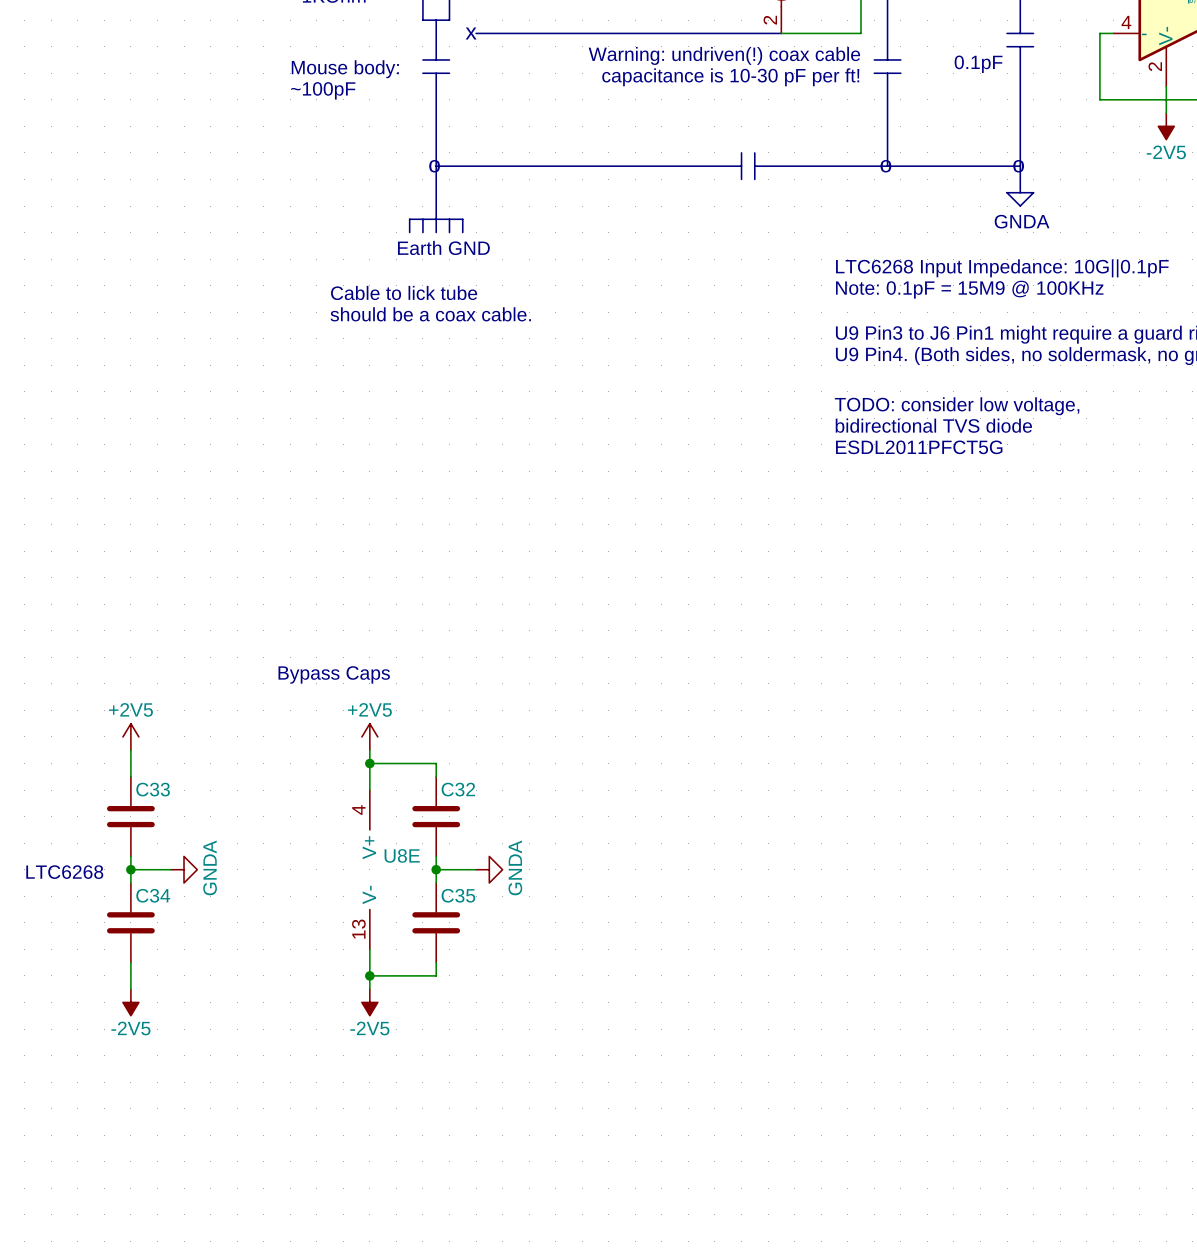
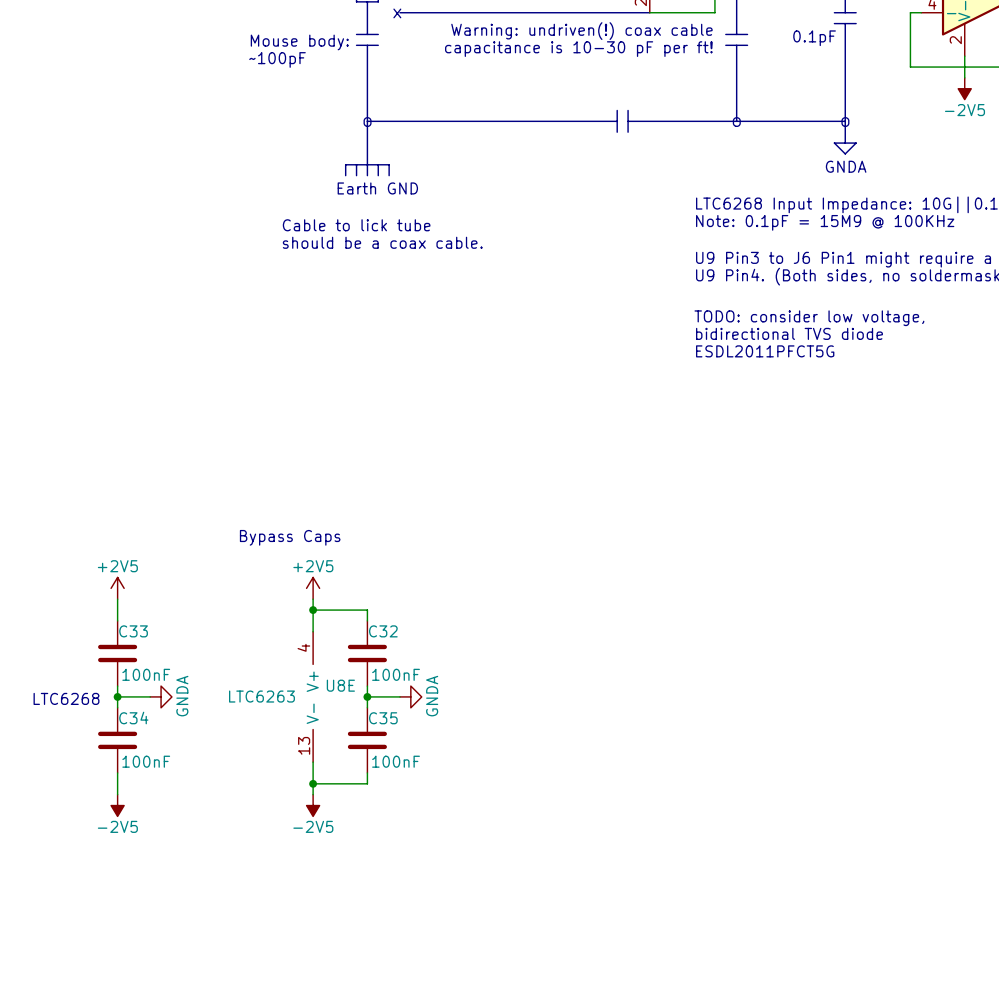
C33 value: none -> 100nF (146, 674)
C32 value: none -> 100nF (396, 674)
U8E value: none -> LTC6263 (261, 696)
C34 value: none -> 100nF (146, 761)
C35 value: none -> 100nF (396, 761)

